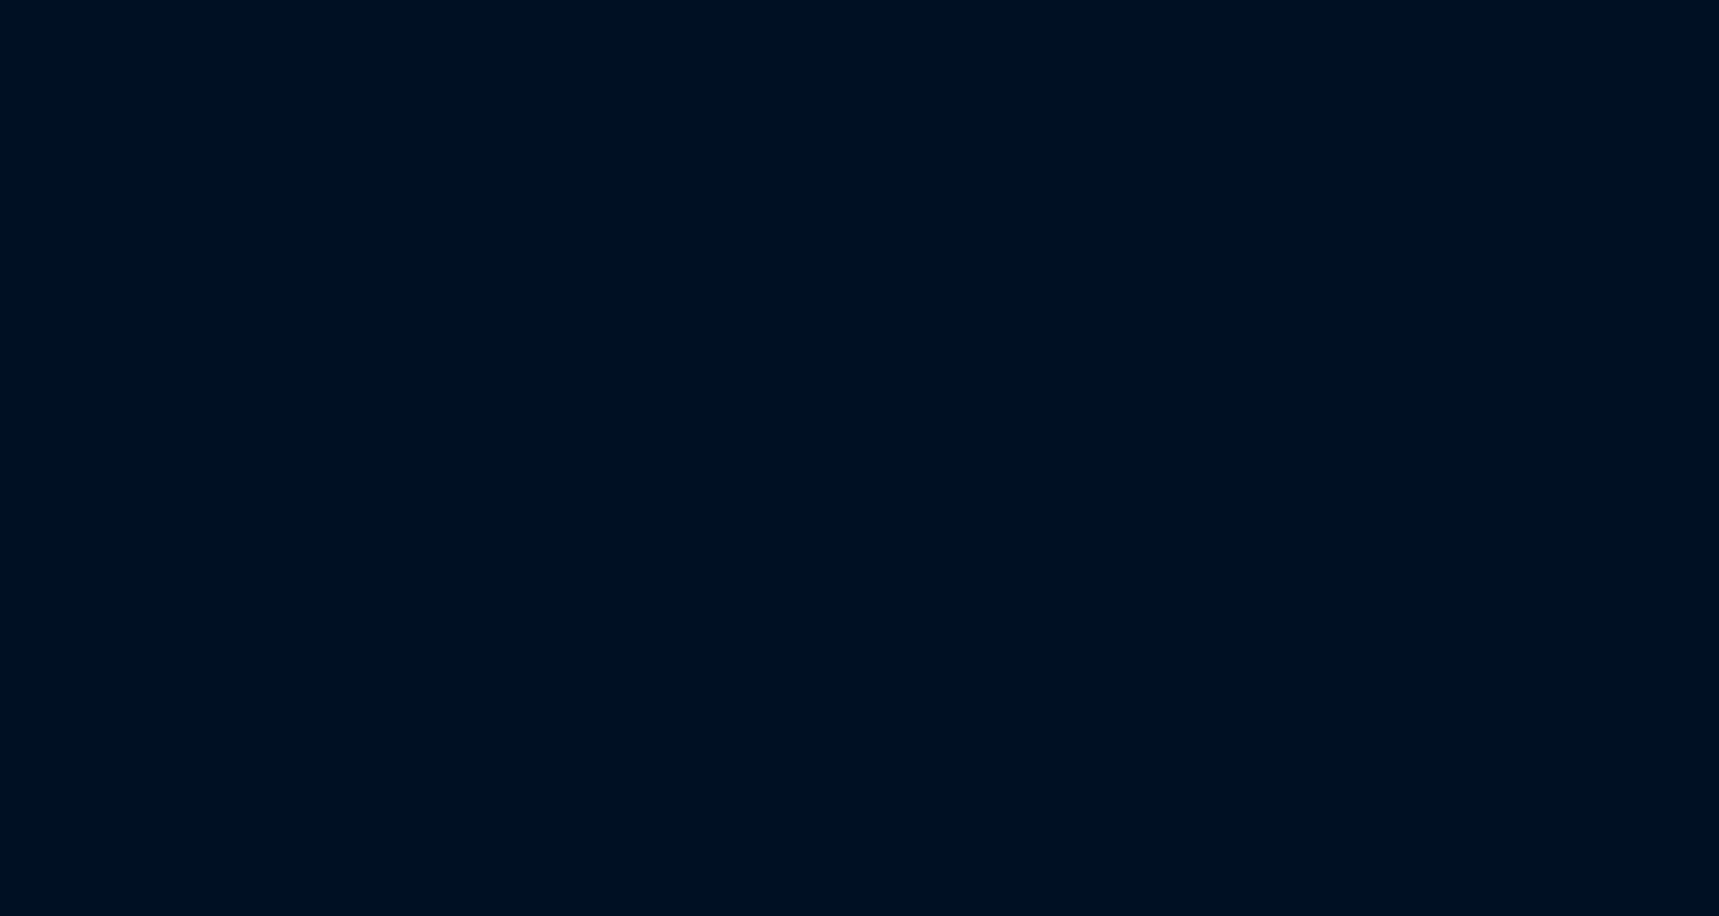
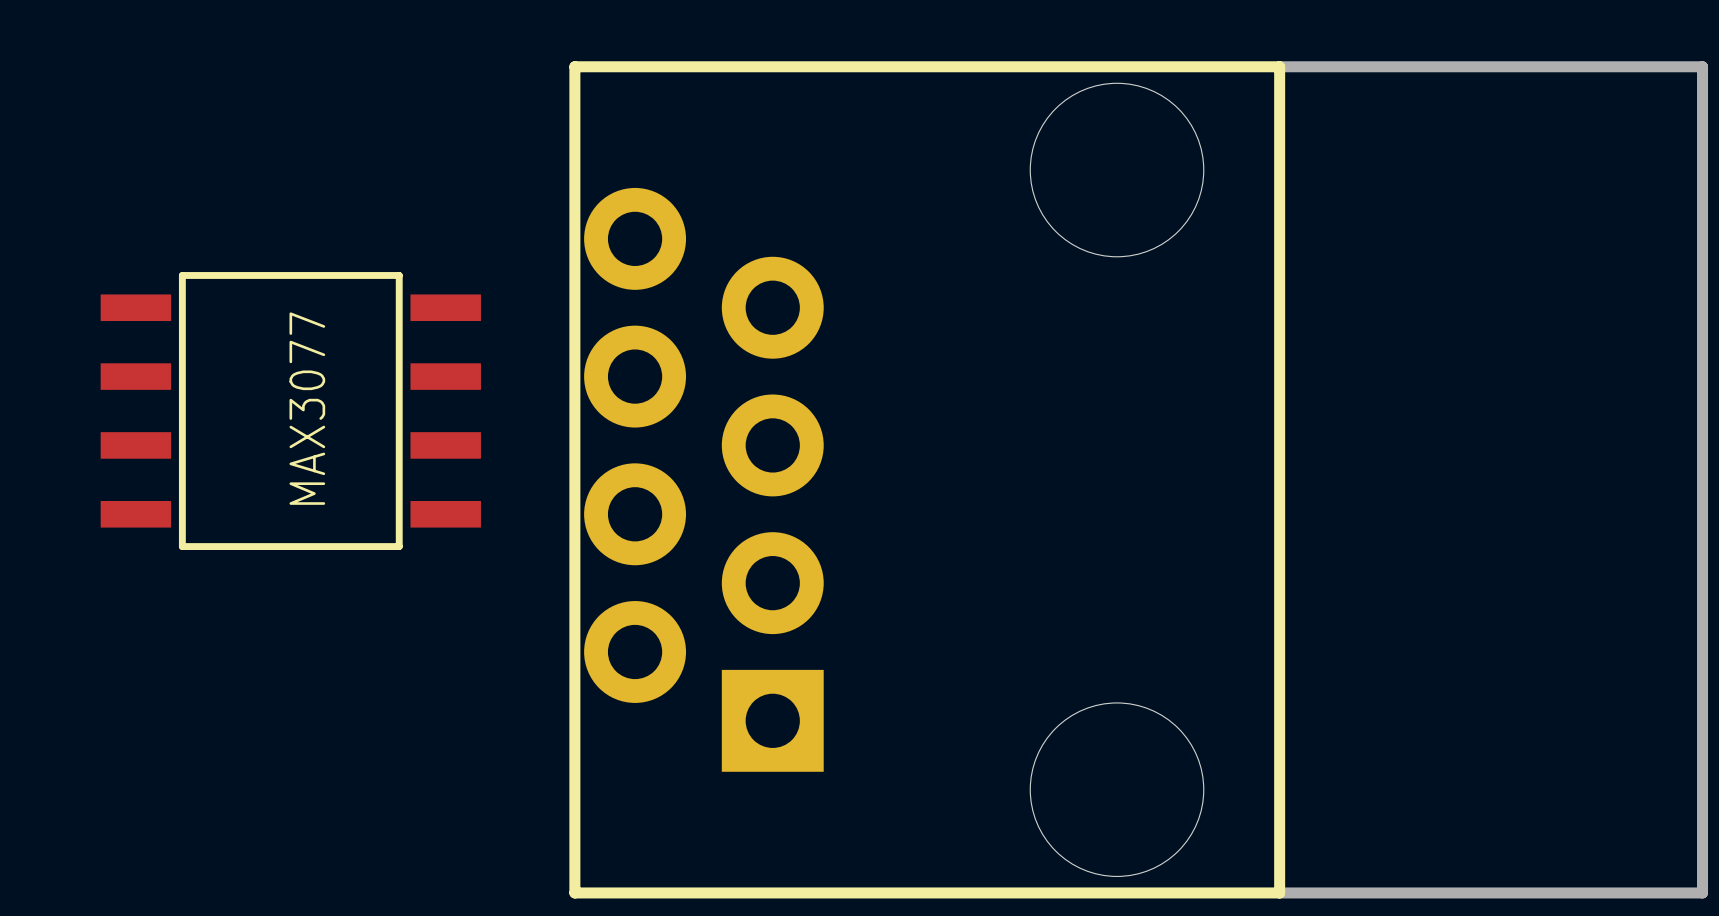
part: none -> (290, 411)
part: none -> (1138, 479)

